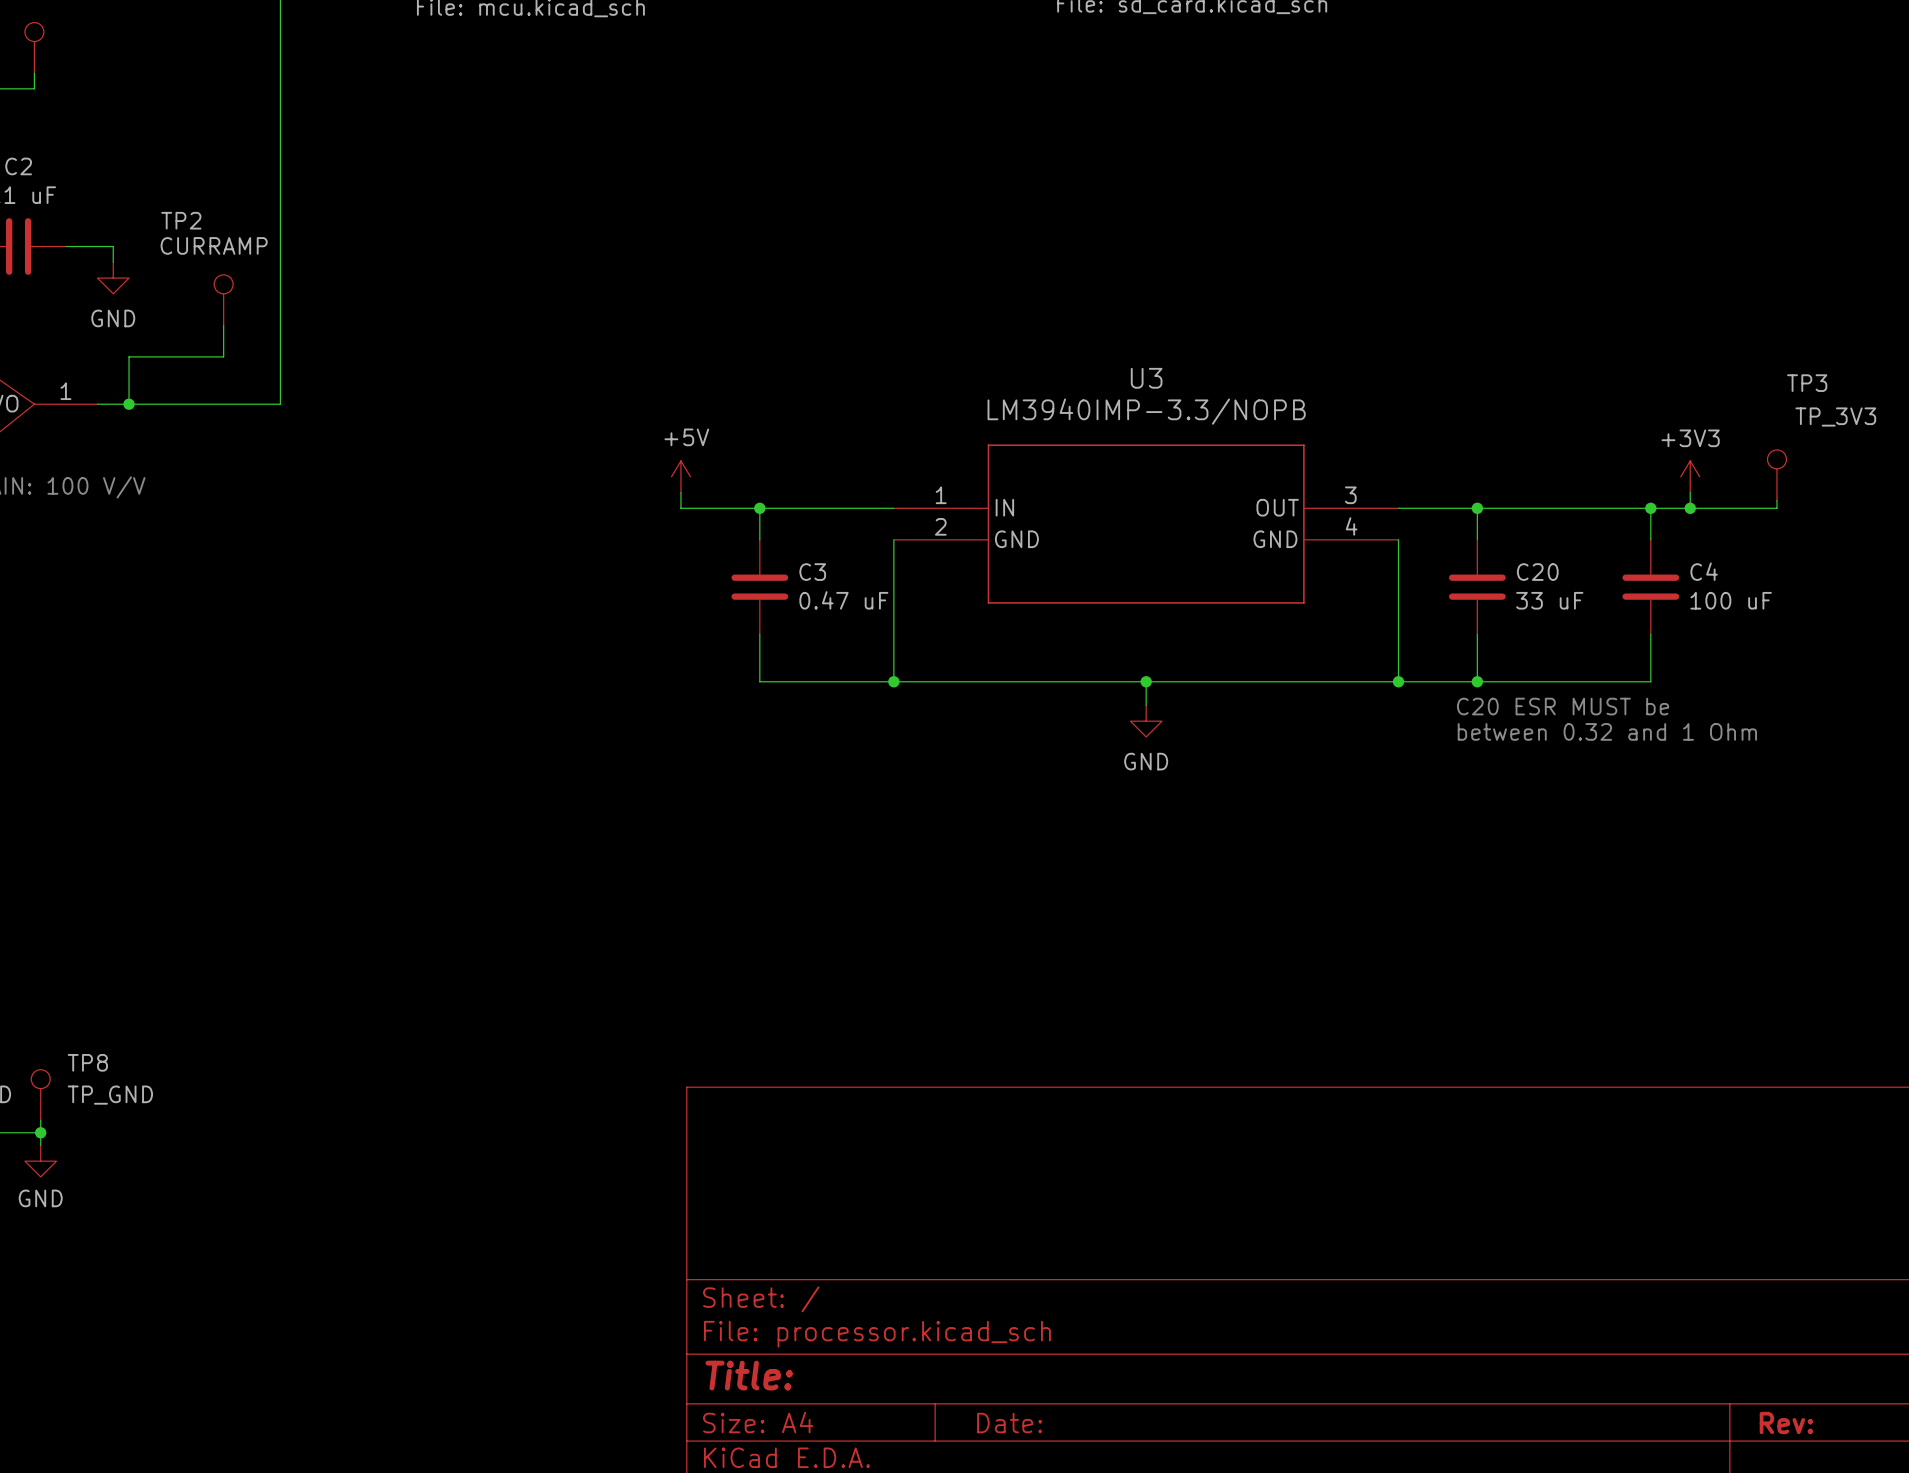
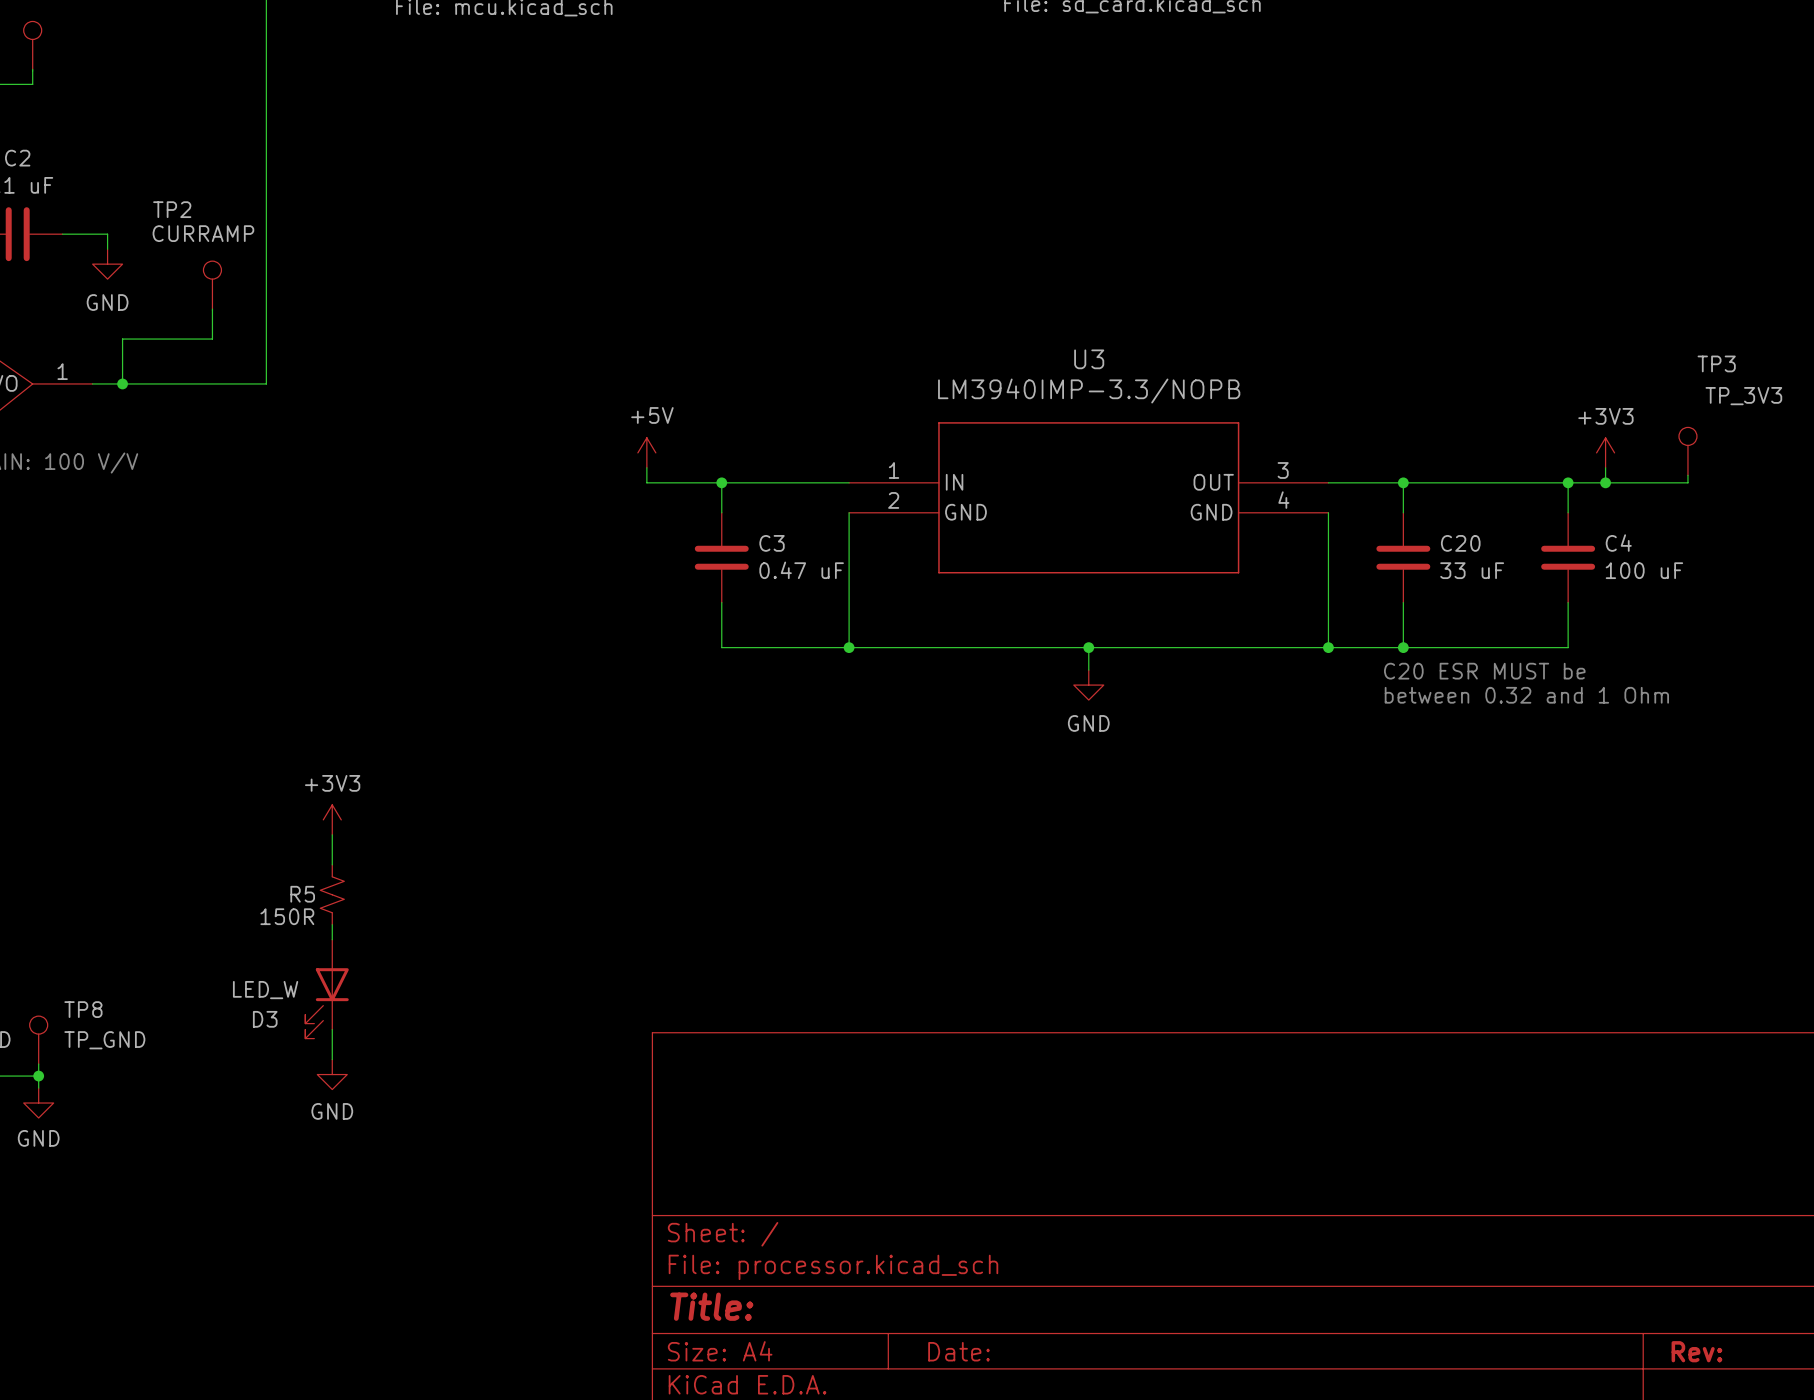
power symbol: none -> +3V3 (332, 819)
wire: none -> (332, 834) (332, 864)
R5: none -> 150R (332, 894)
wire: none -> (332, 924) (332, 939)
D3: none -> LED_W (327, 989)
wire: none -> (332, 1029) (332, 1059)
power symbol: none -> GND (332, 1074)

